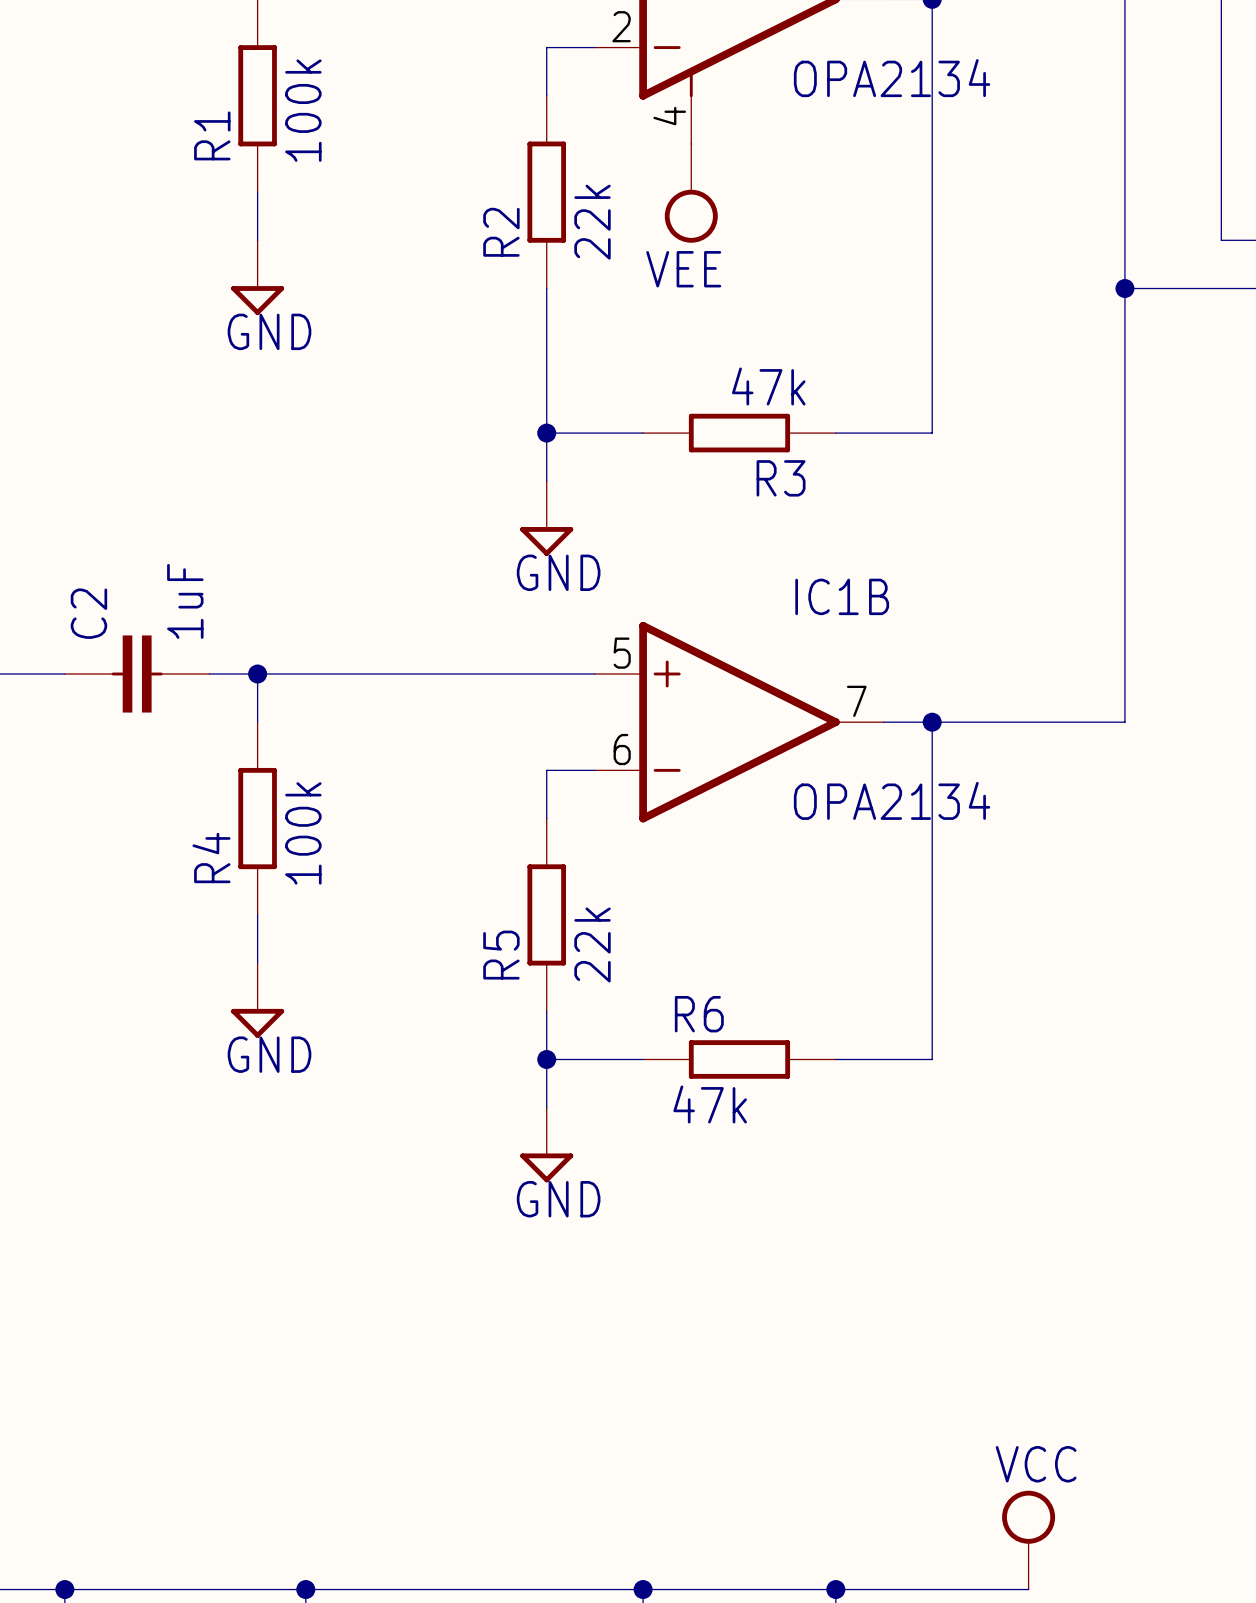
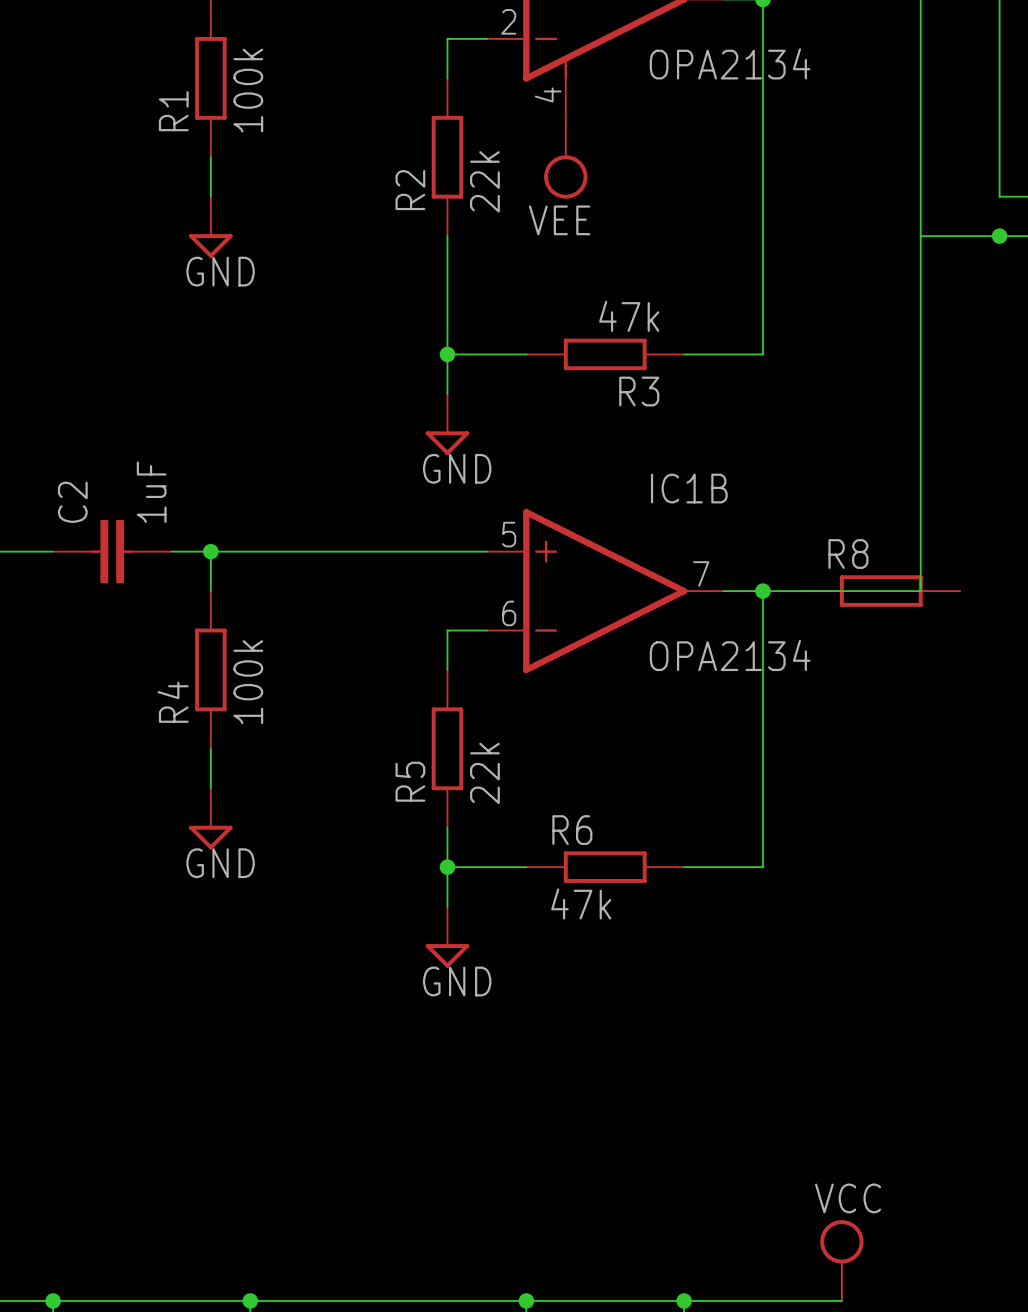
junction: (1124, 288) -> none
junction: none -> (999, 236)
R8: none -> (881, 591)

